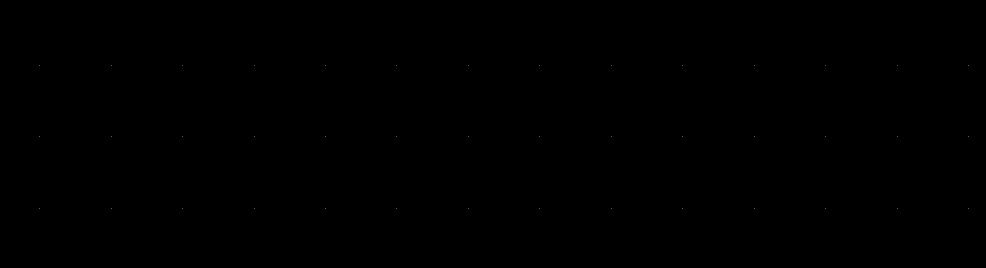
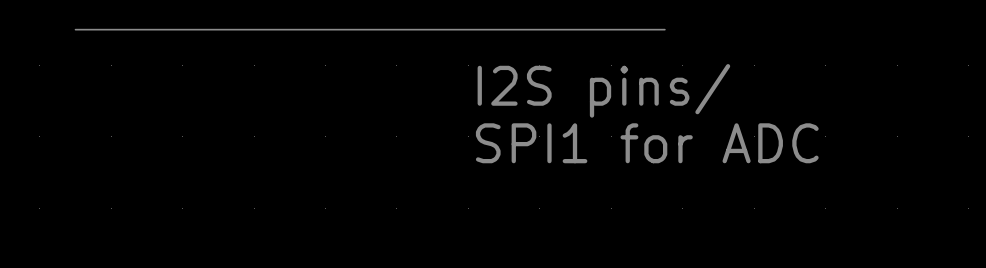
line: none -> (75, 29) (664, 29)
text: none -> I2S pins/ (603, 90)
text: none -> SPI1 for ADC (647, 143)

